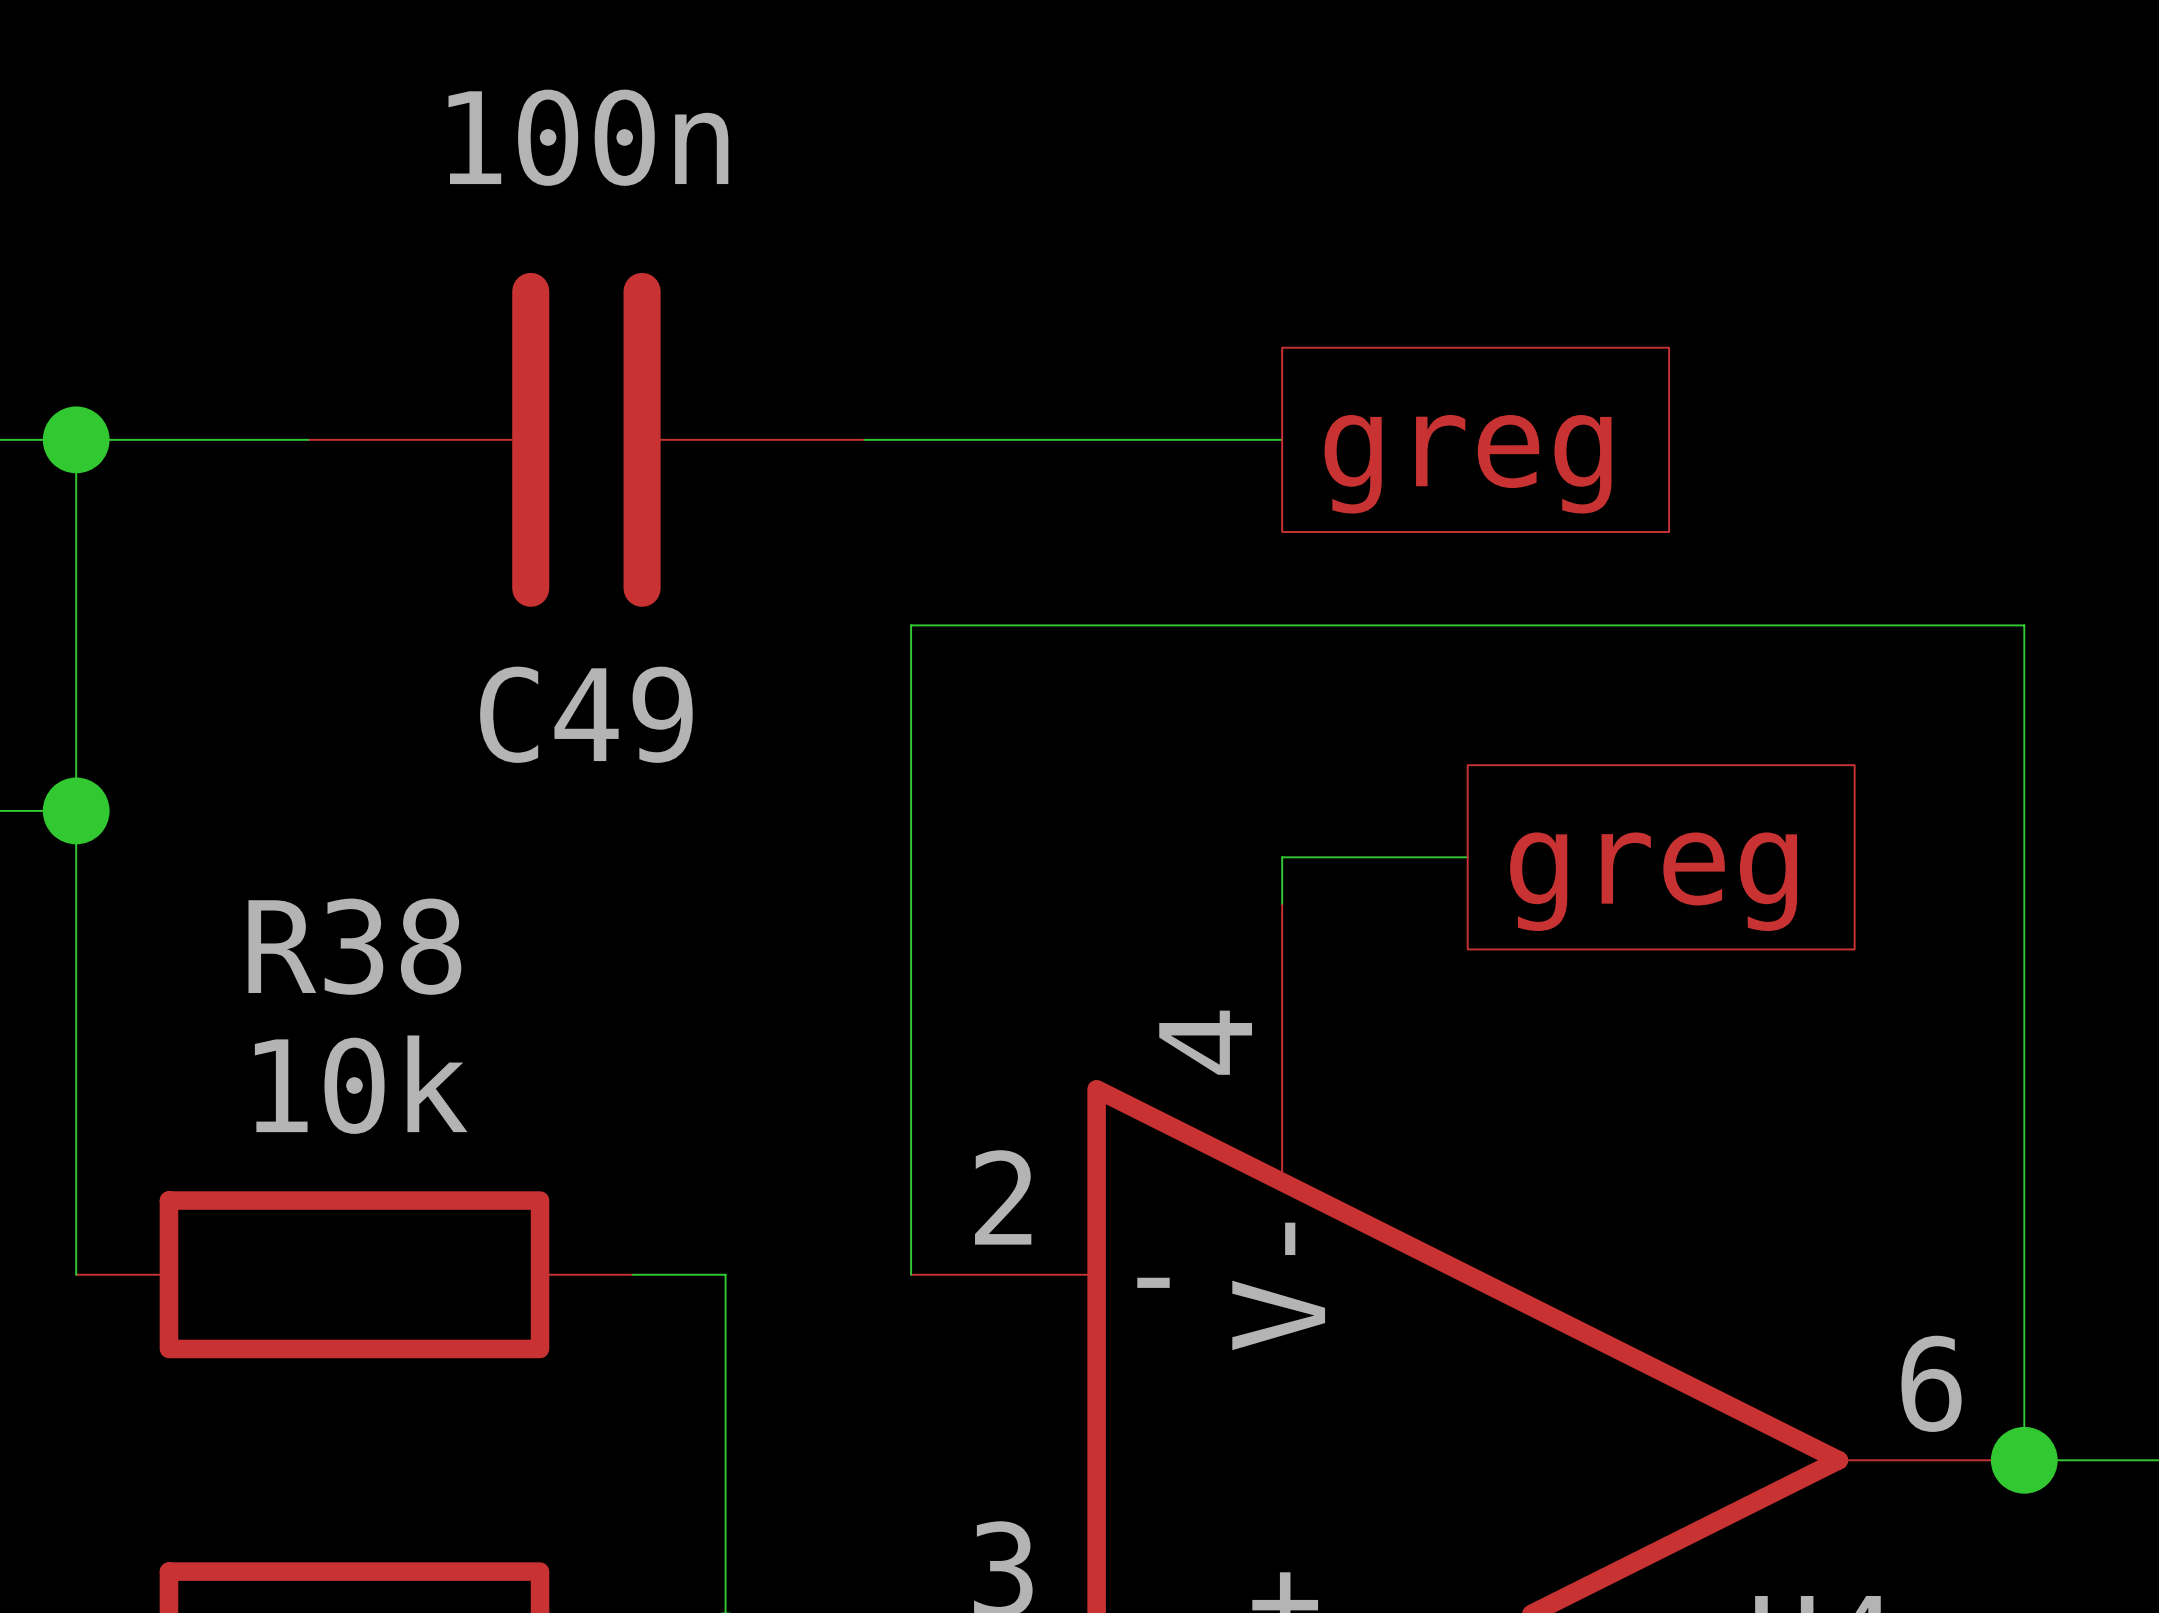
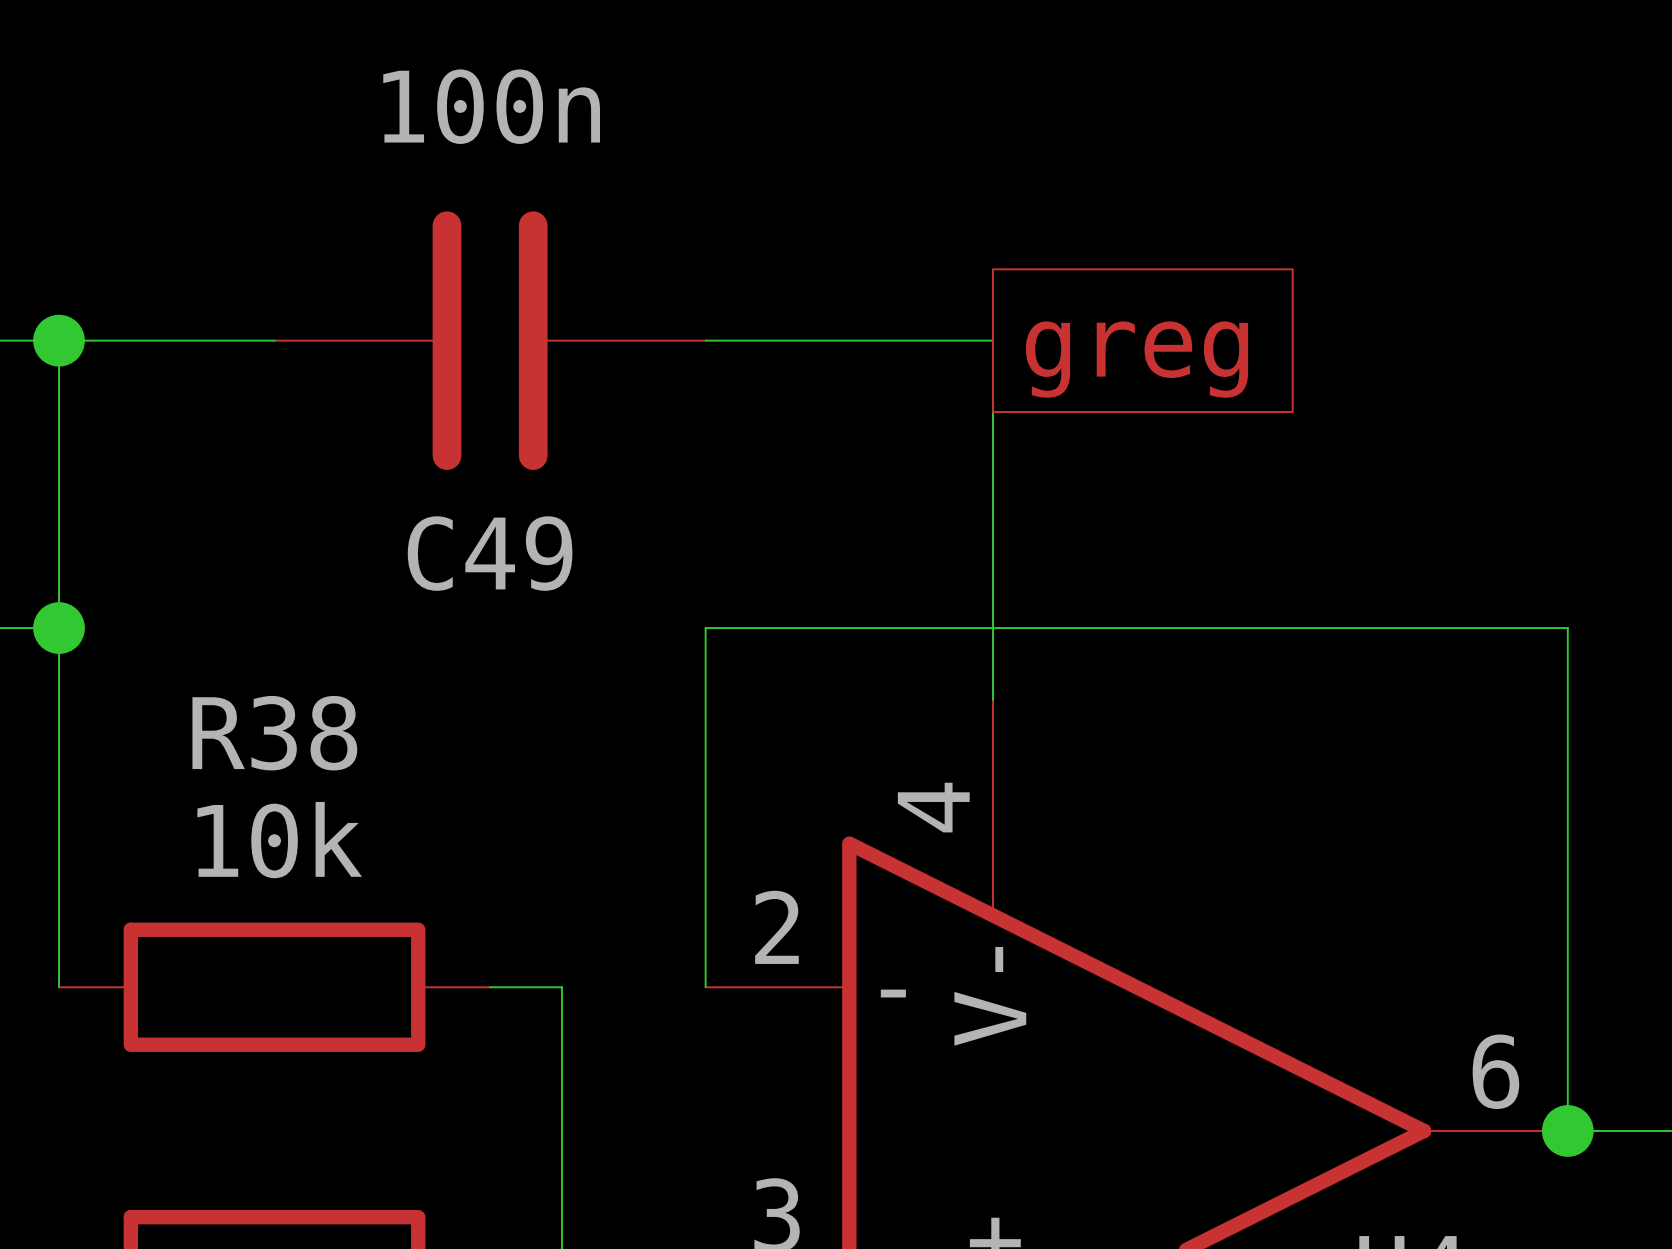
C49 position: (586, 439) -> (490, 340)
wire: (911, 810) (911, 625) (2024, 625) (2024, 810) -> (705, 628) (1567, 628)
wire: (1282, 857) (1467, 857) -> (993, 663) (993, 340)
global label: greg (1653, 881) -> none

